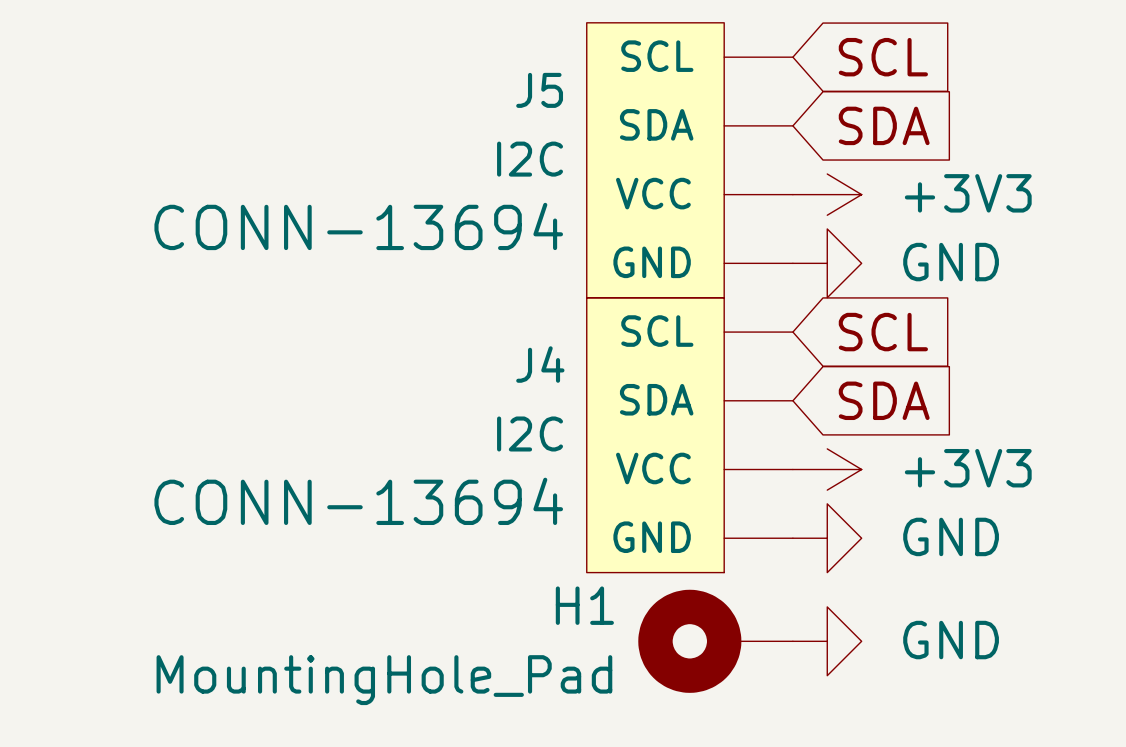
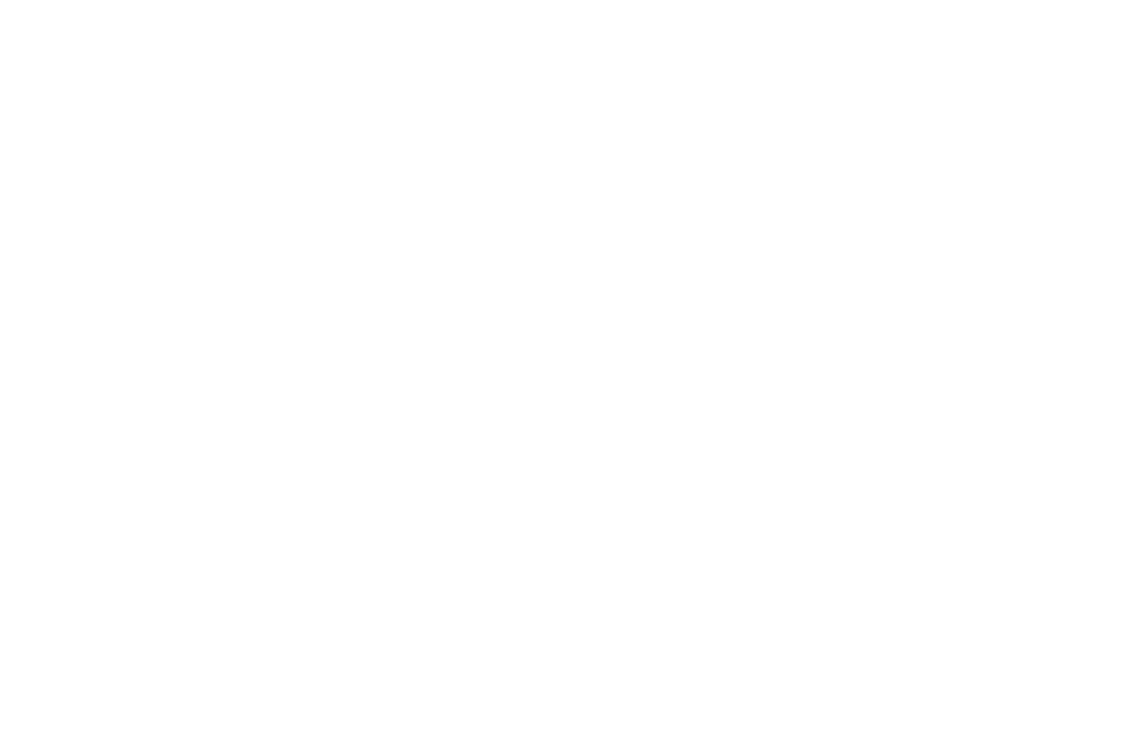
global label: SCL (883, 57) -> none
global label: SDA (884, 125) -> none
J5: I2C (689, 160) -> none
power symbol: +3V3 (827, 194) -> none
power symbol: GND (827, 263) -> none
global label: SCL (883, 332) -> none
global label: SDA (884, 400) -> none
J4: I2C (689, 435) -> none
power symbol: +3V3 (827, 469) -> none
power symbol: GND (827, 538) -> none
H1: MountingHole_Pad (715, 641) -> none
power symbol: GND (827, 641) -> none

